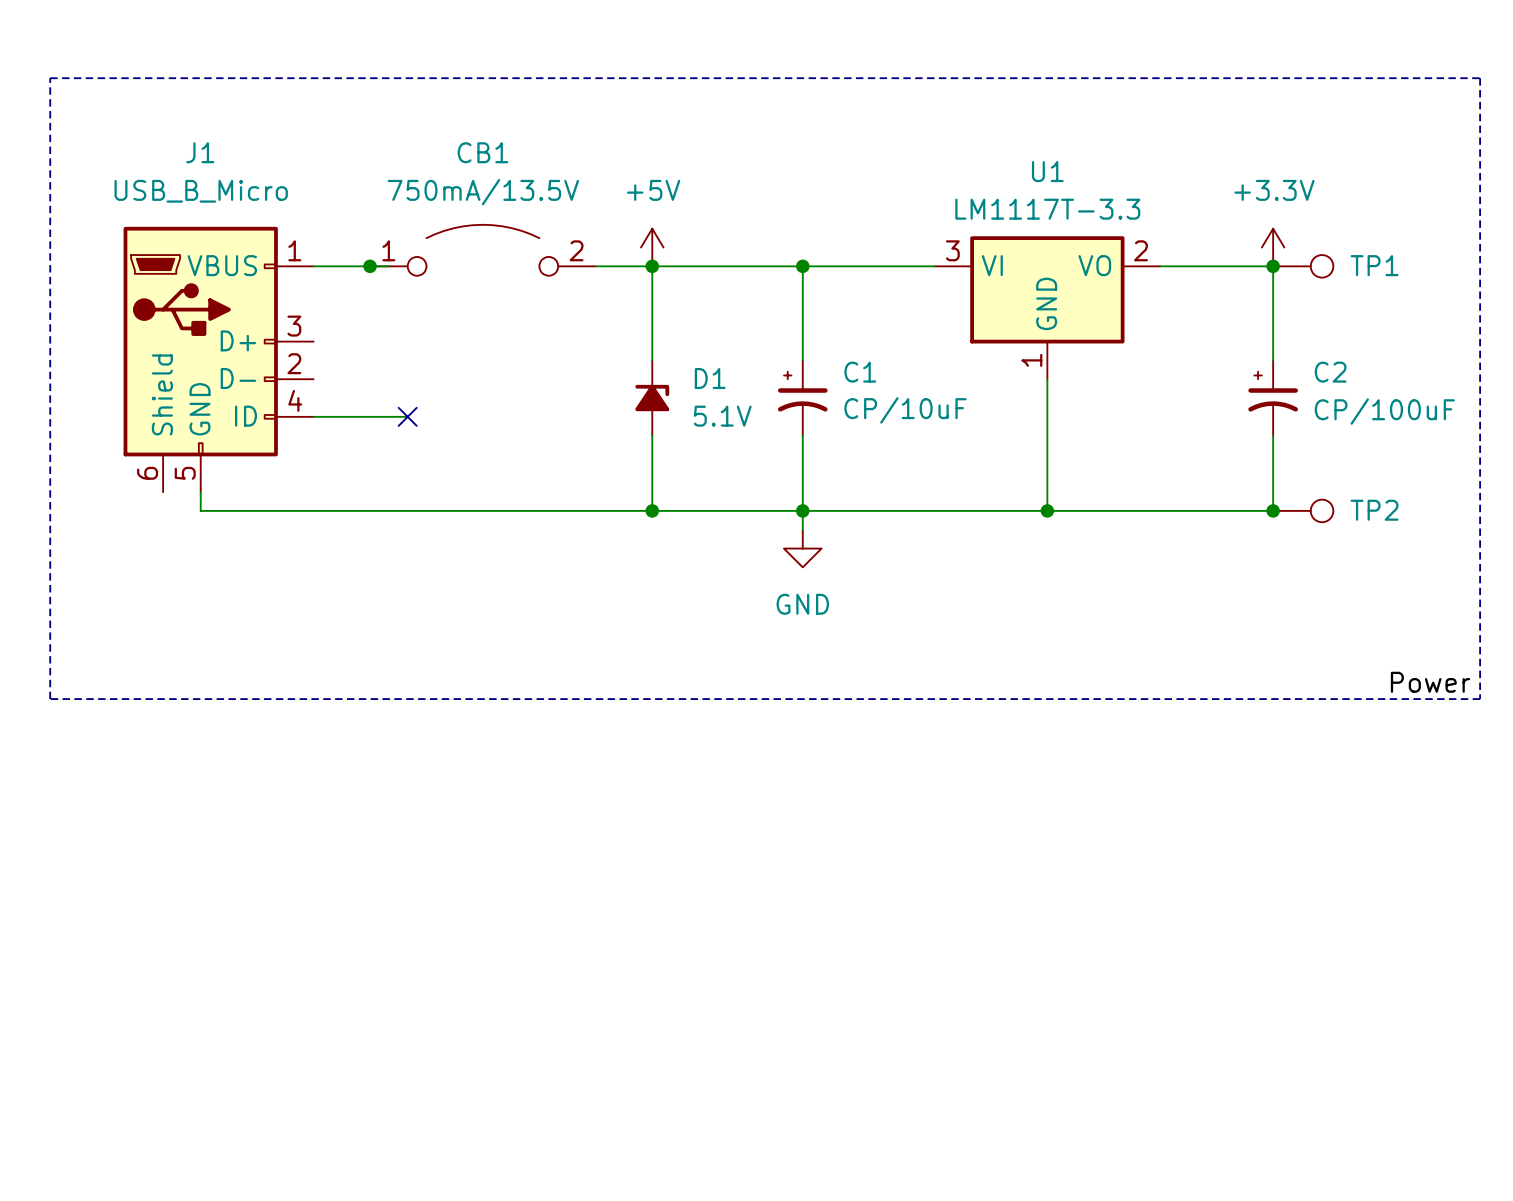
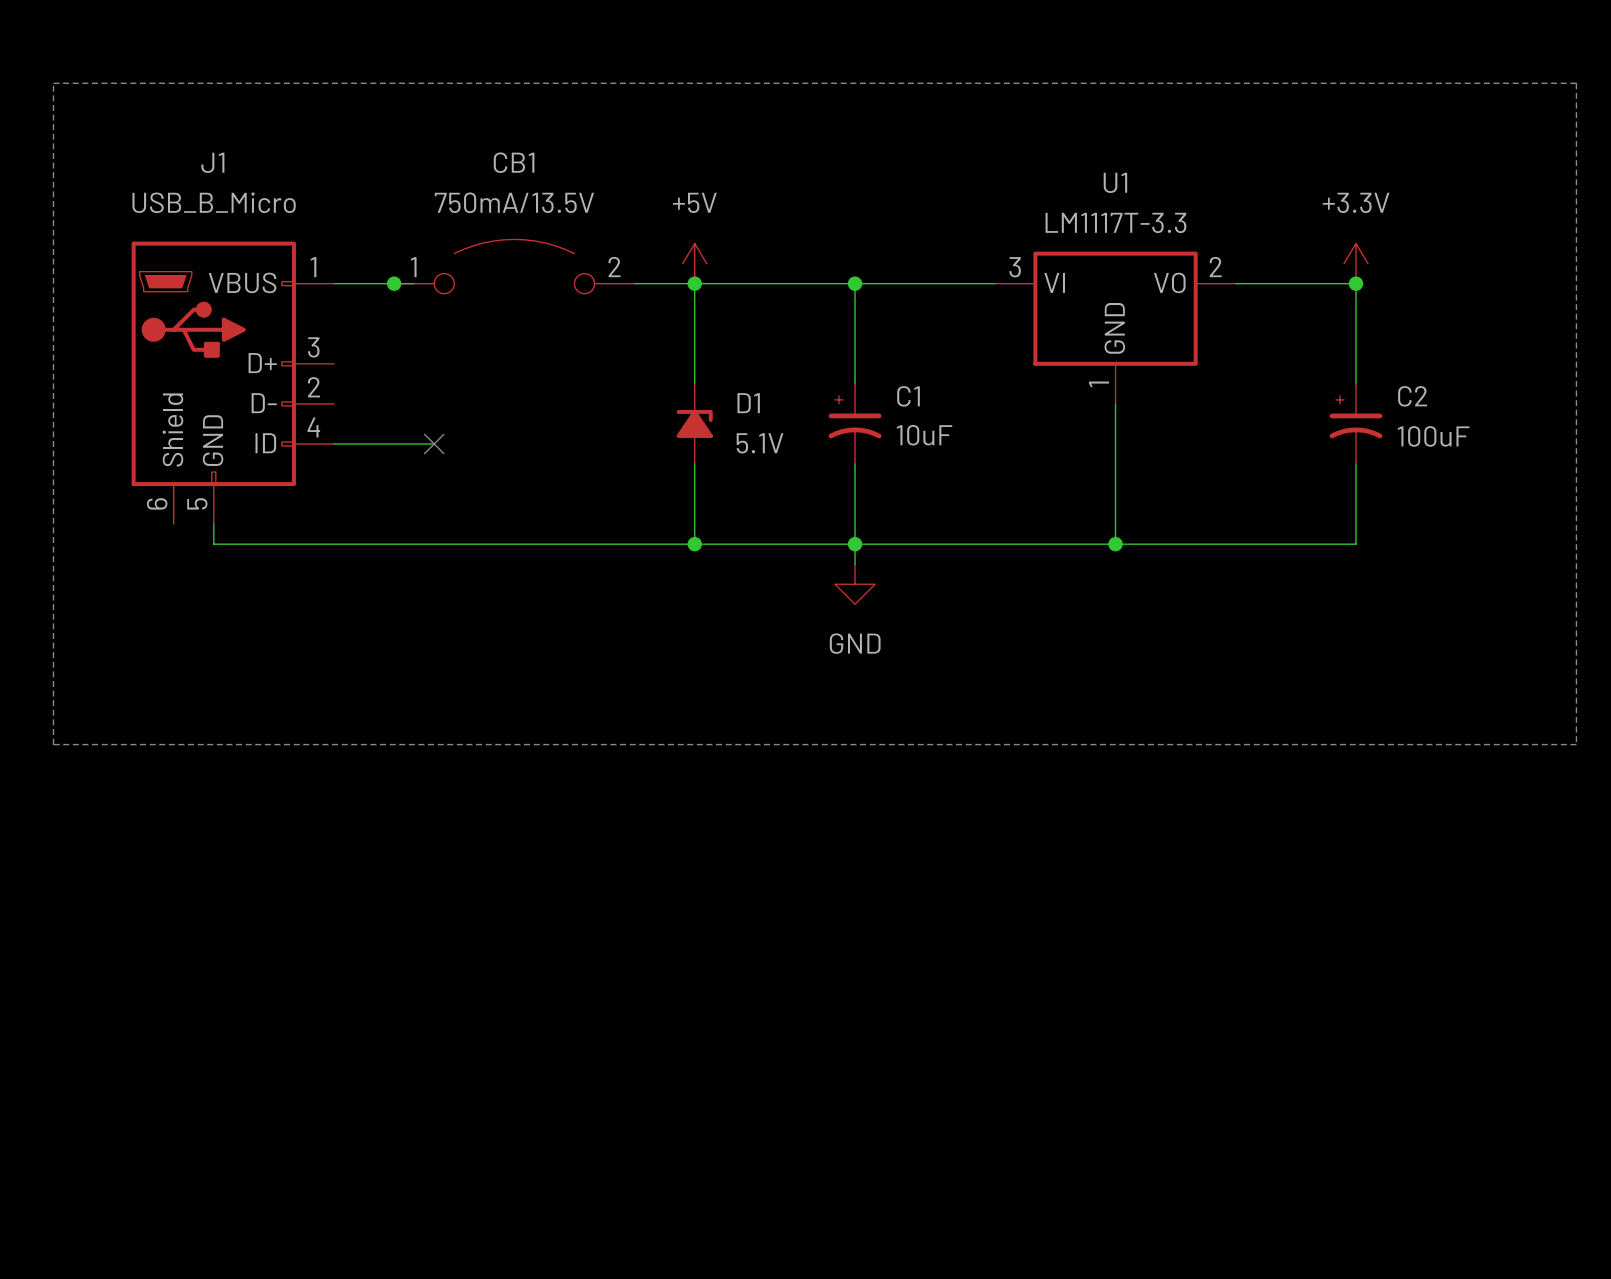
TP1: (1303, 266) -> none
C1 value: CP/10uF (905, 410) -> 10uF (924, 435)
C2 value: CP/100uF (1384, 411) -> 100uF (1433, 436)
junction: (1273, 510) -> none
TP2: (1303, 510) -> none
label: Power (1430, 682) -> none

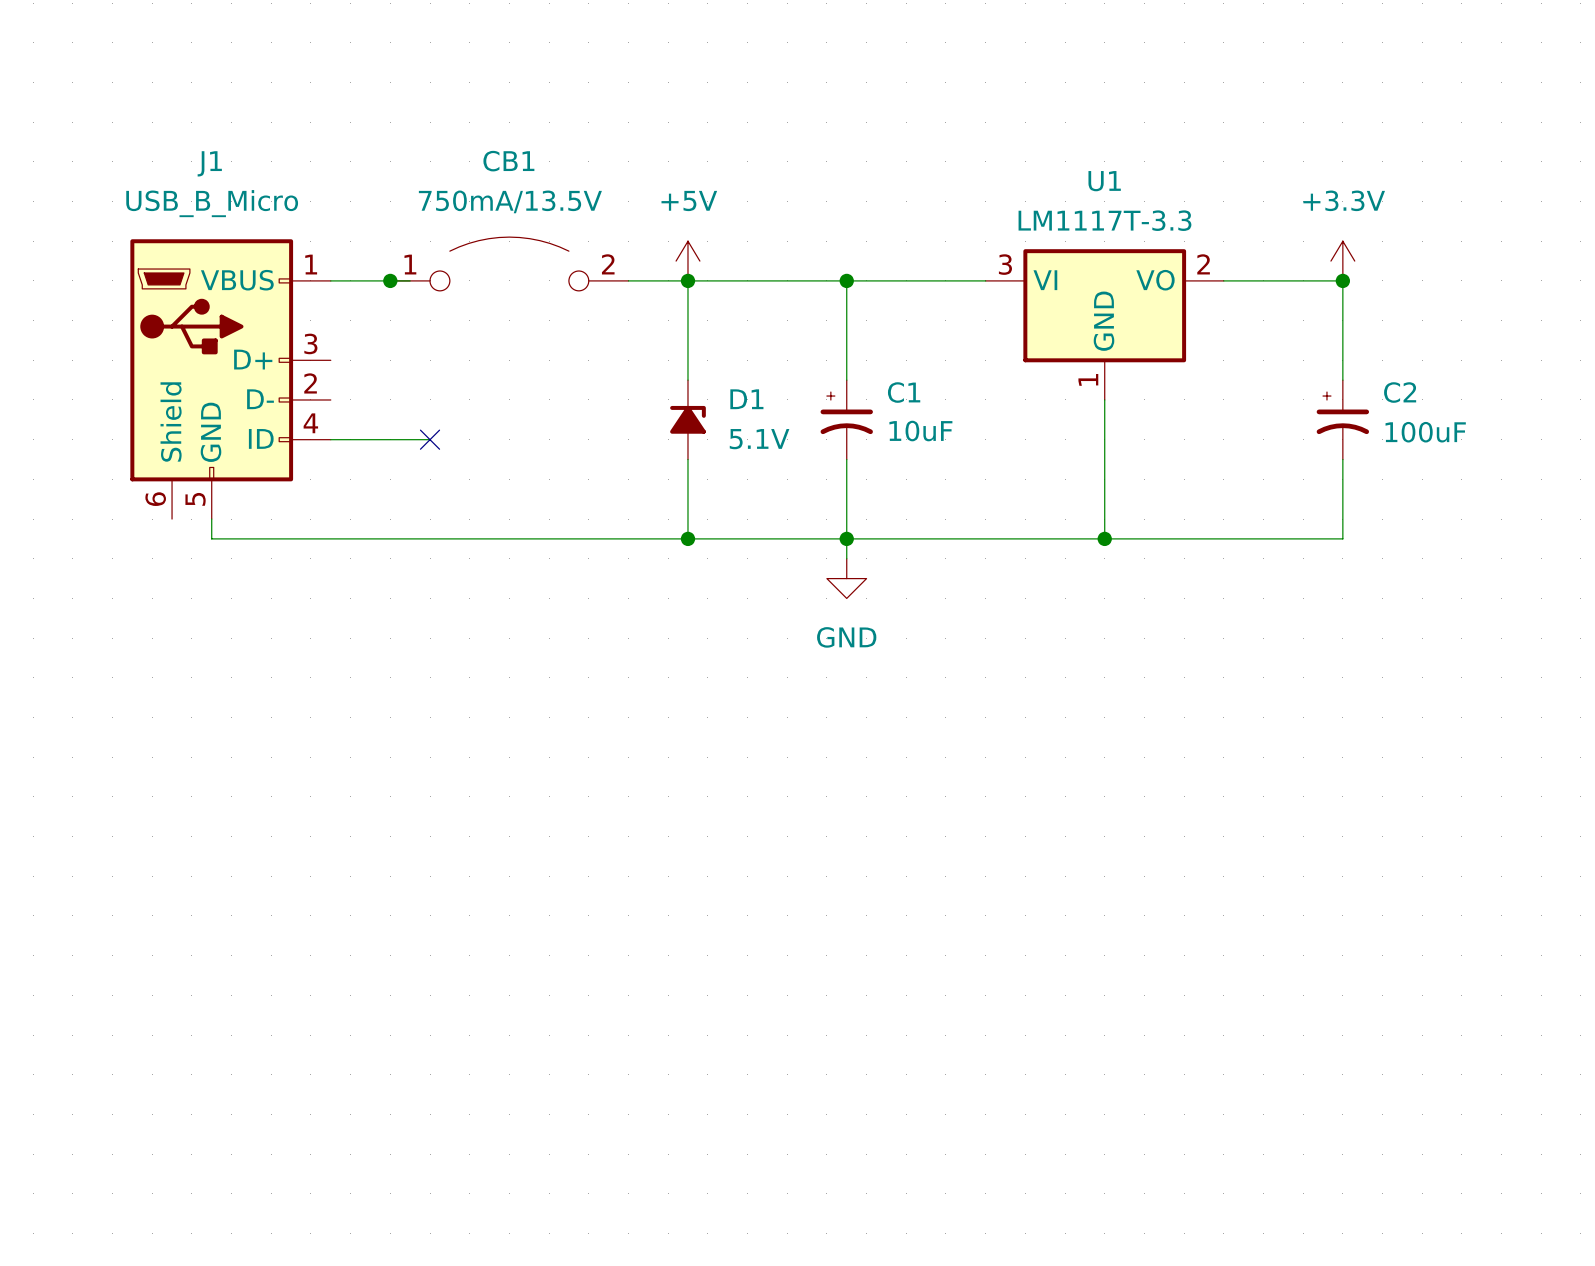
line: (53, 83) (1576, 83) (1576, 744) (53, 744) (53, 83) -> none

